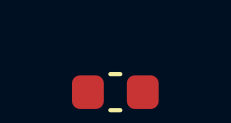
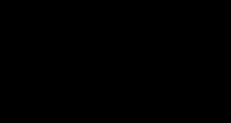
part: (115, 92) -> none

